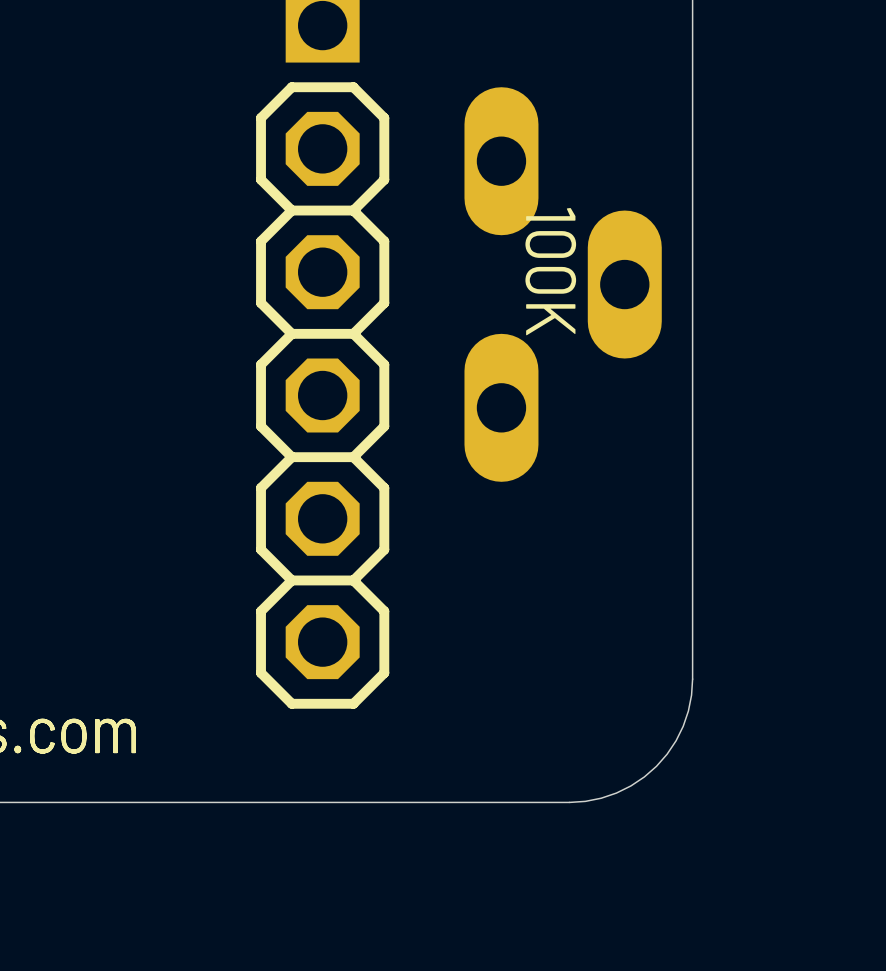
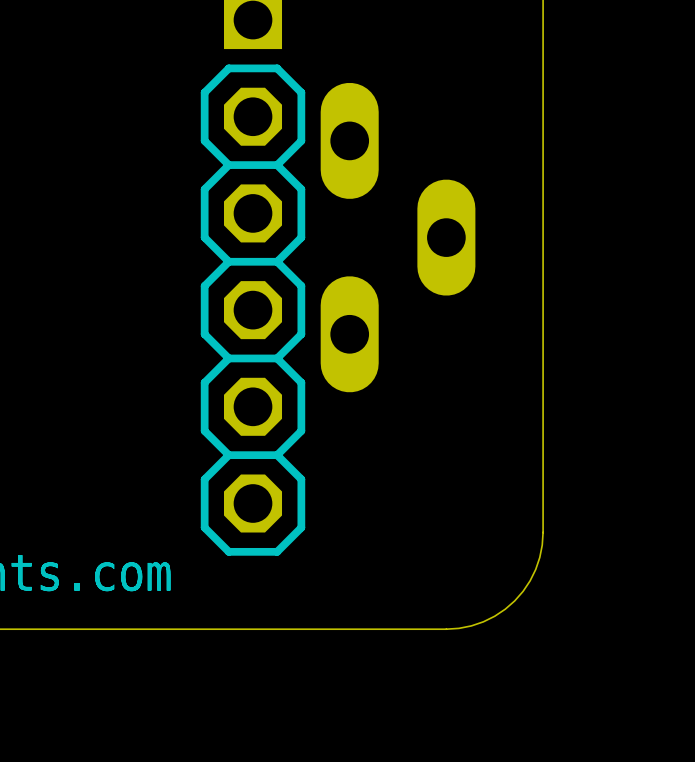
text: 100K (550, 271) -> none
part position: (563, 284) -> (398, 237)

